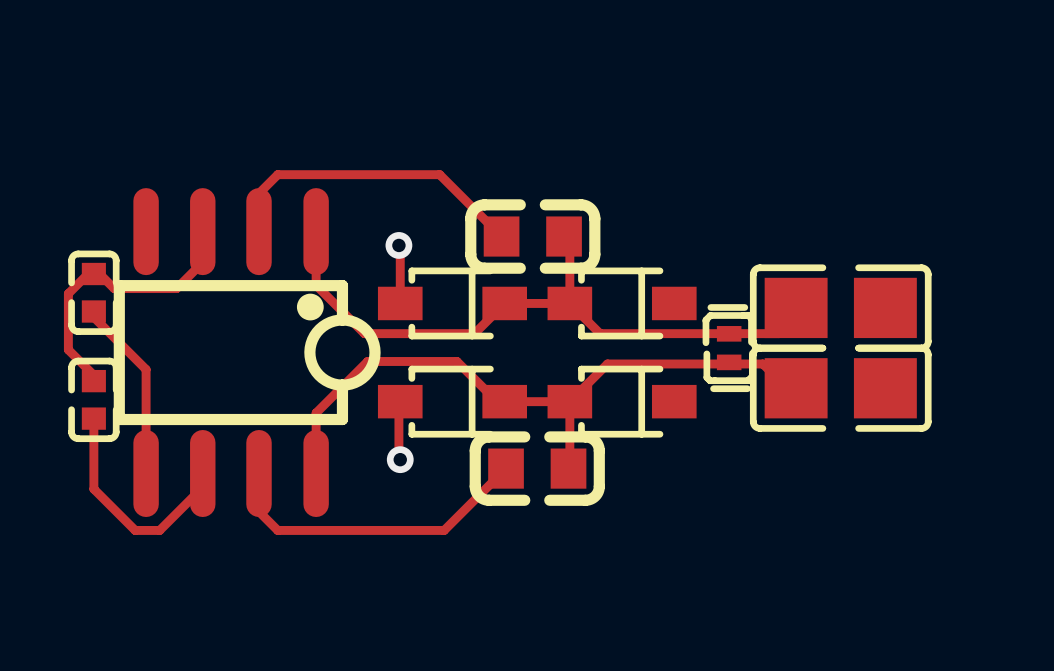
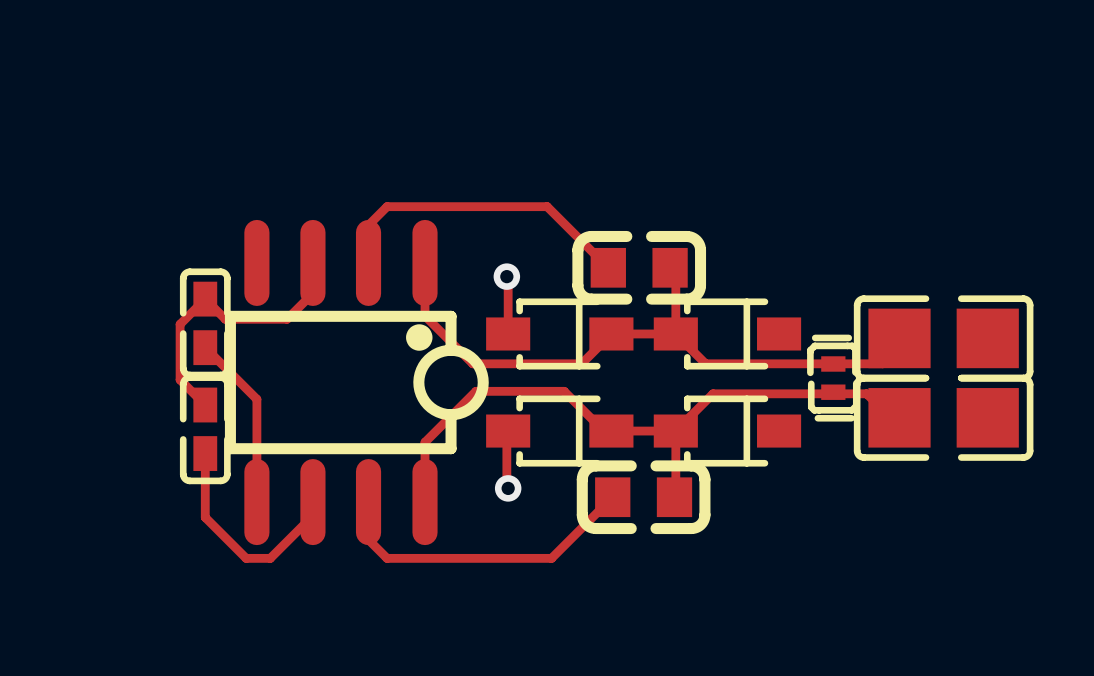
part footprint: [68, 250, 120, 335] -> [179, 268, 231, 379]
part footprint: [68, 357, 120, 443] -> [179, 374, 231, 485]

